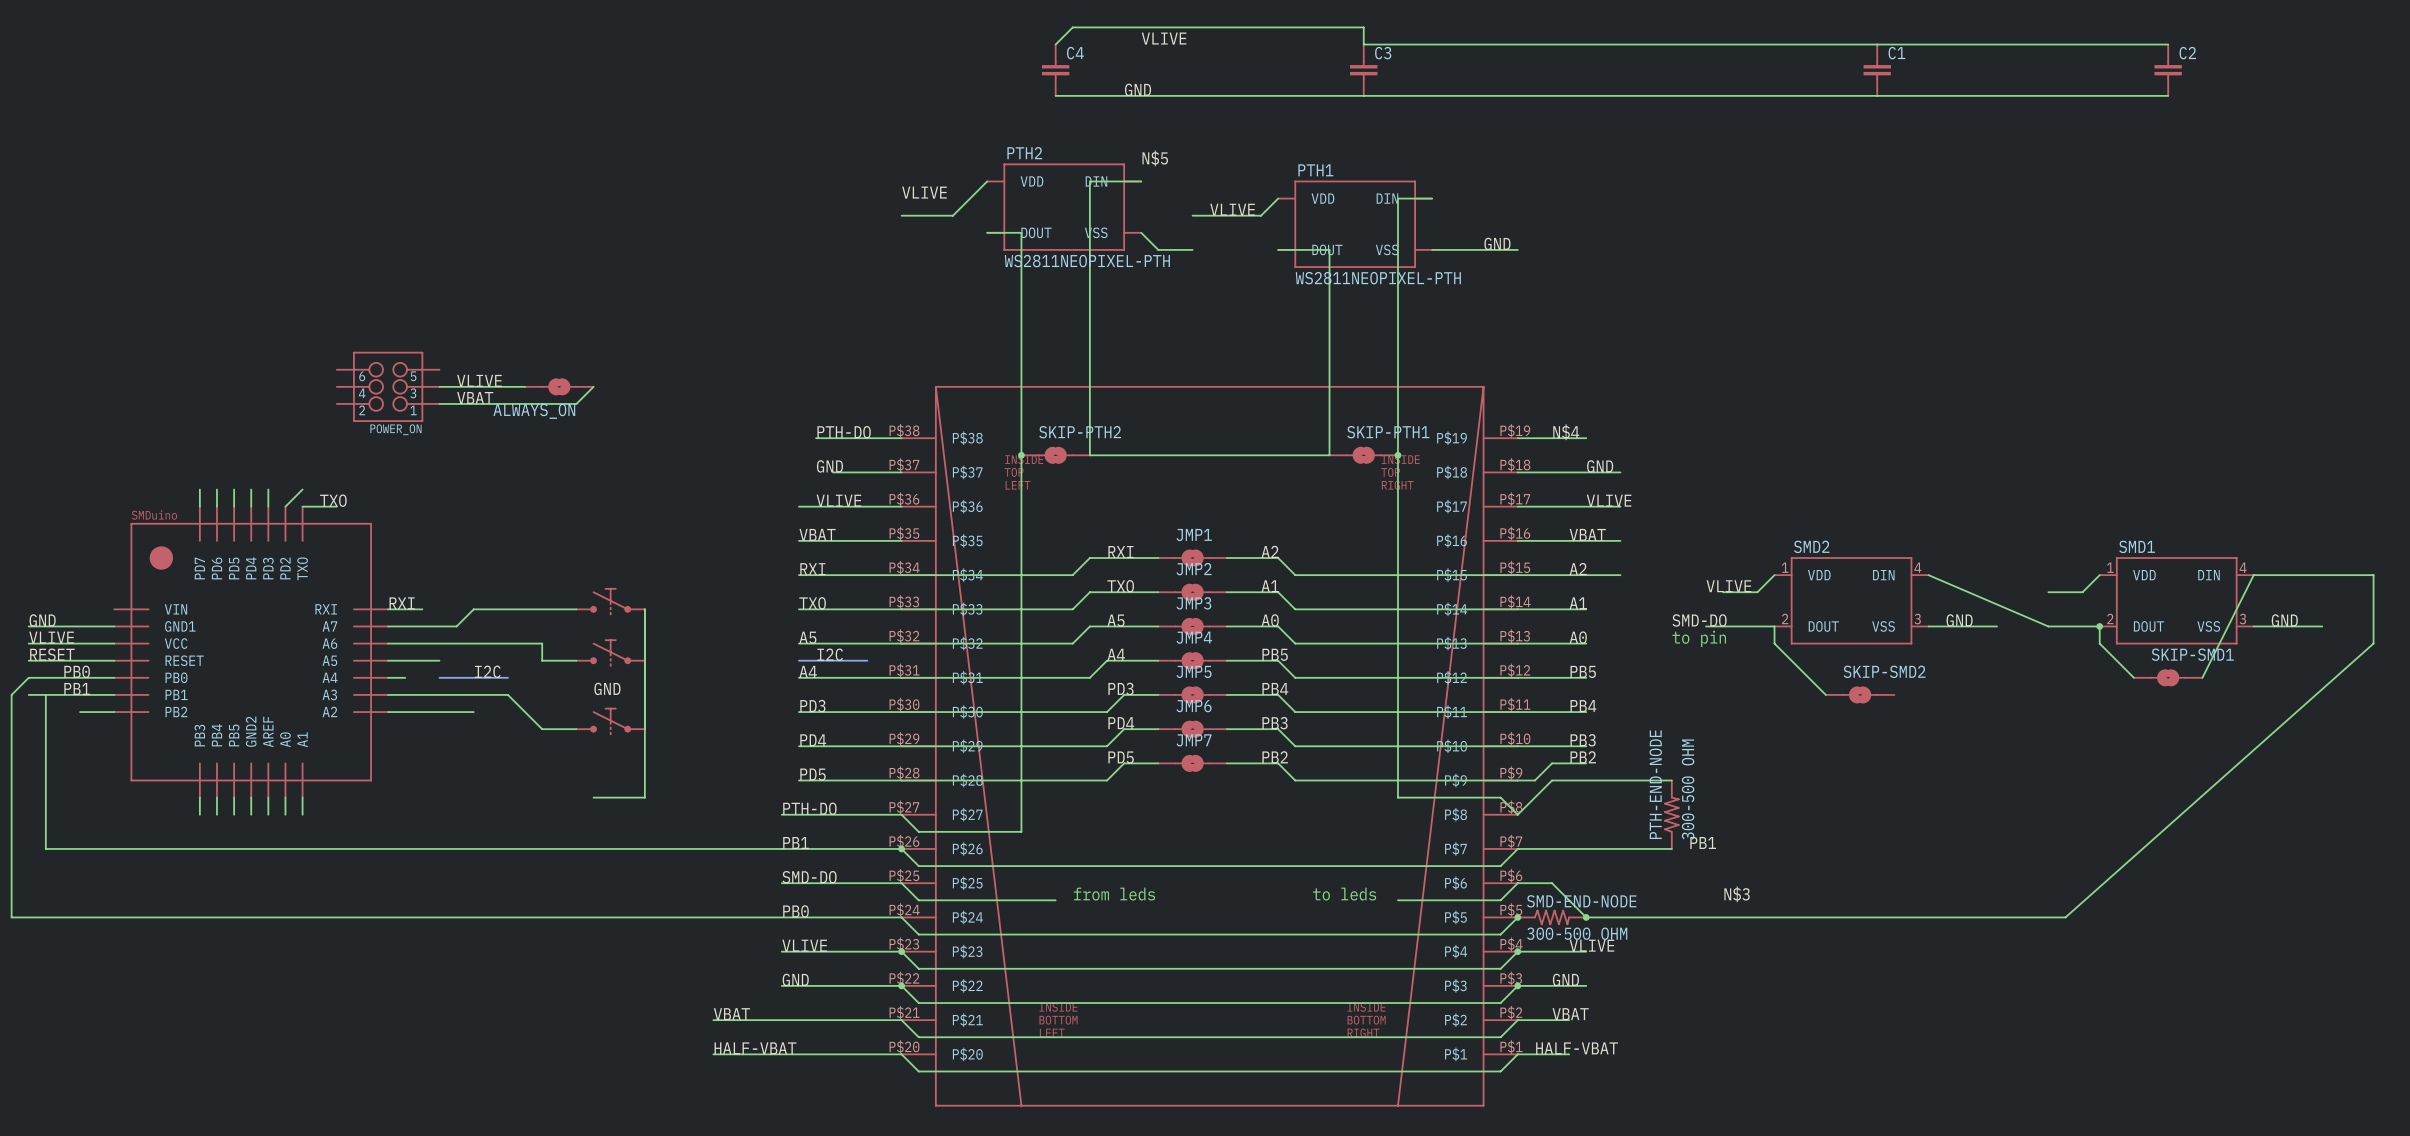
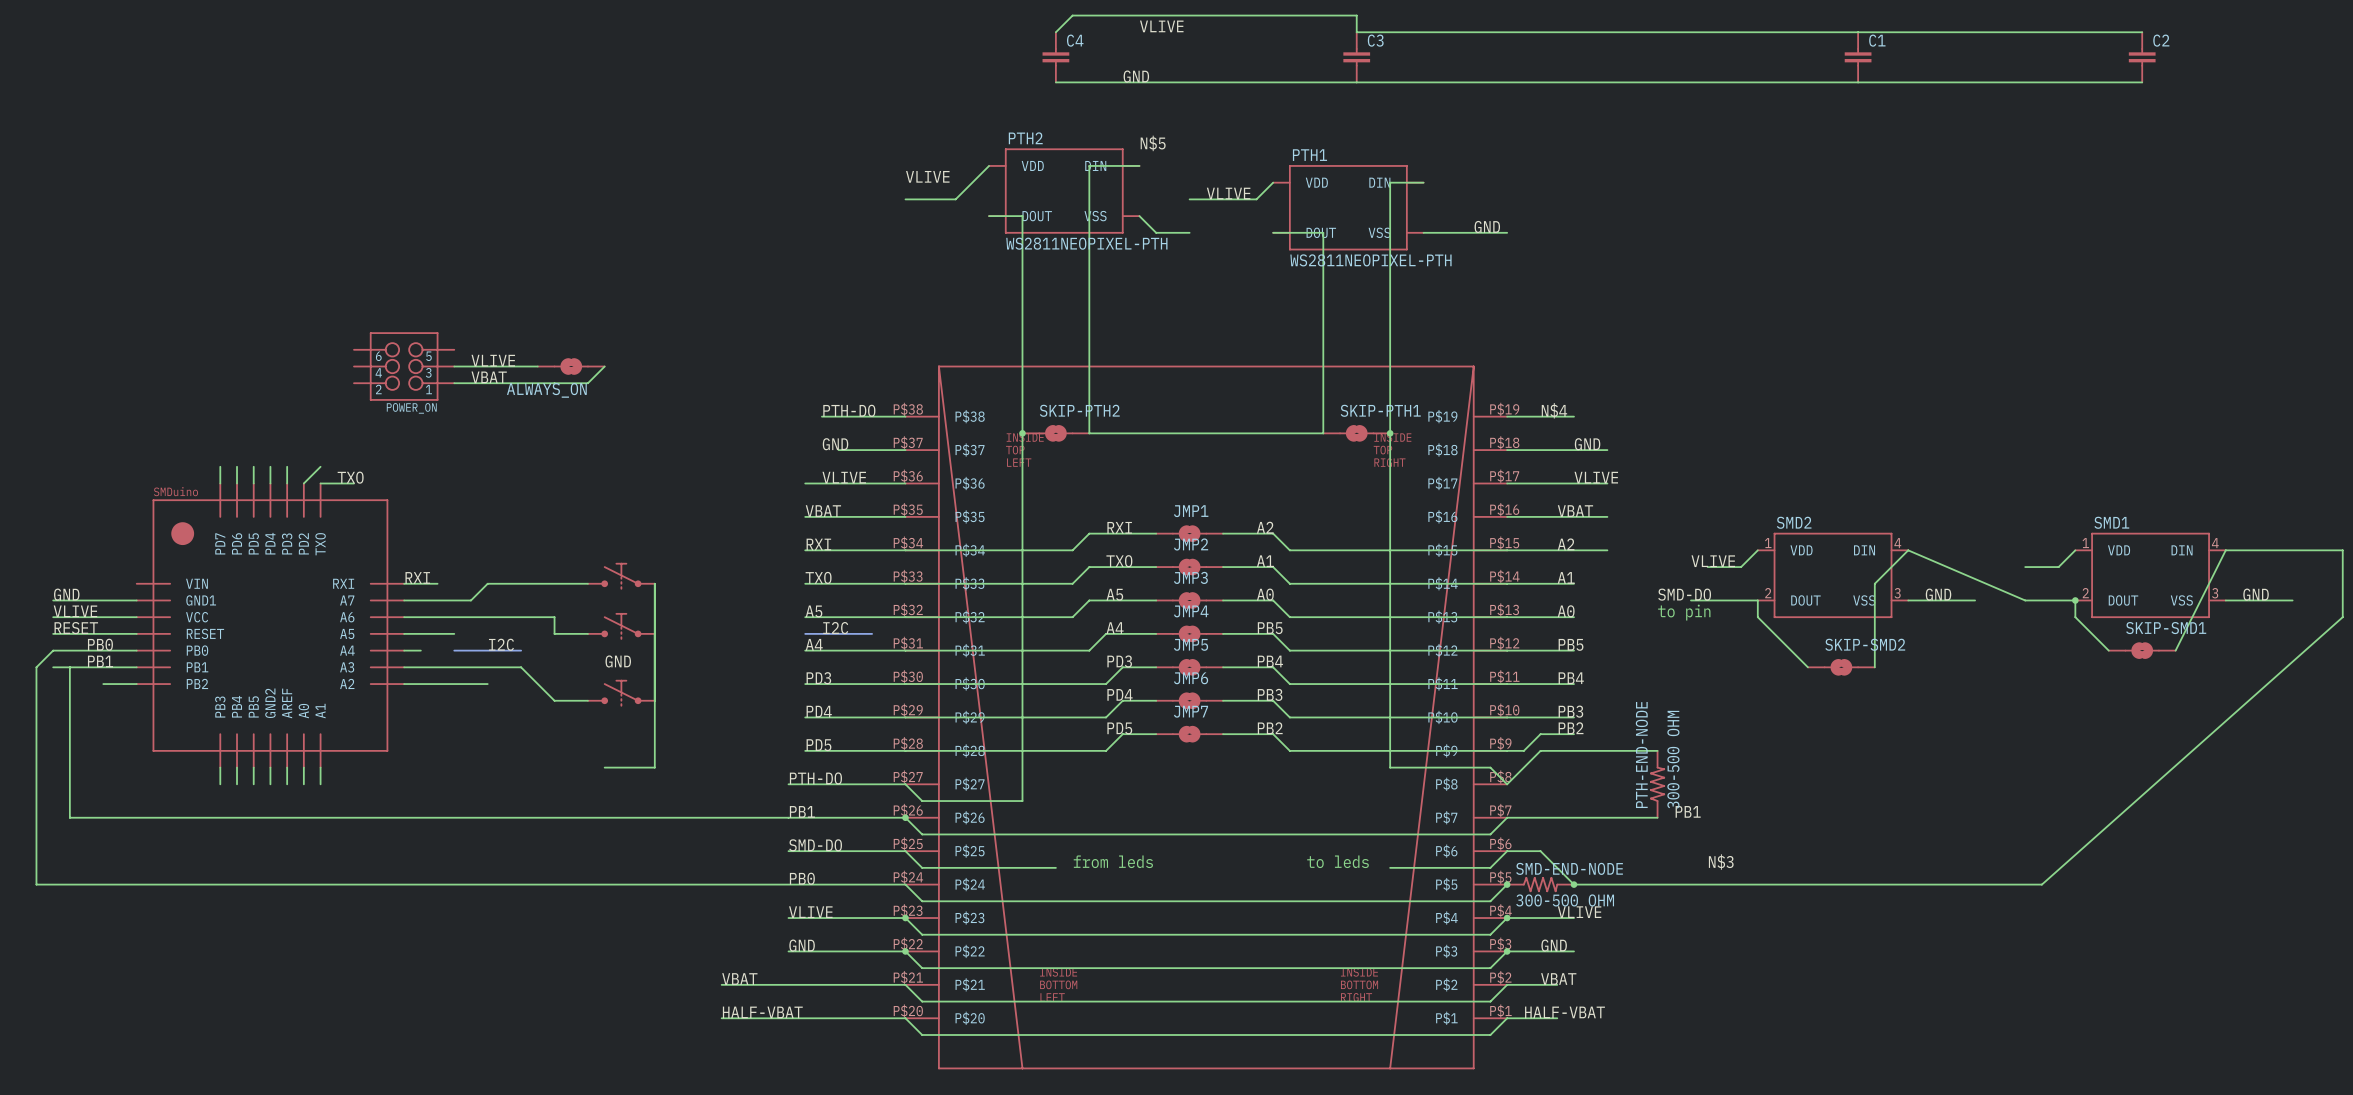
wire: none -> (1908, 550) (1874, 583) (1874, 667)

